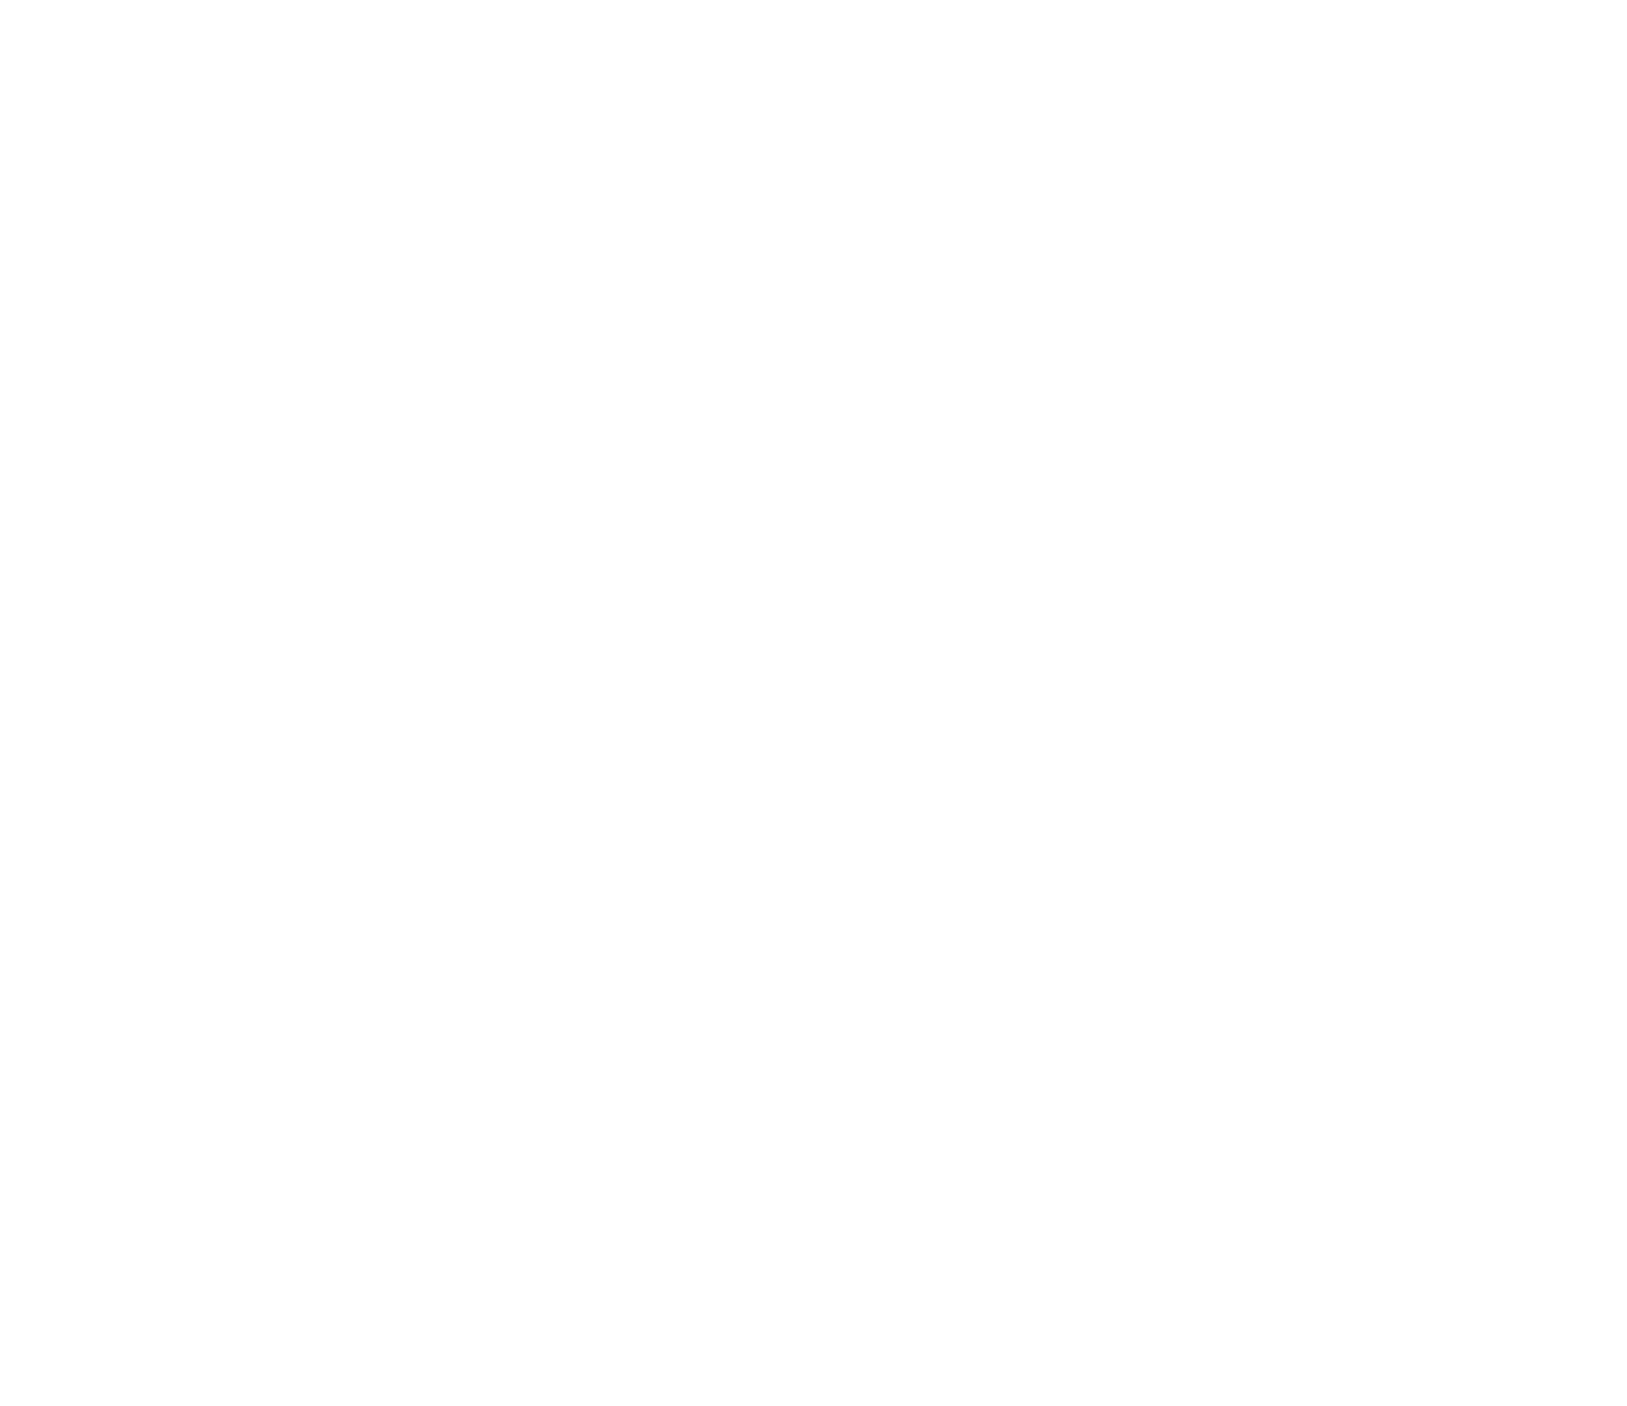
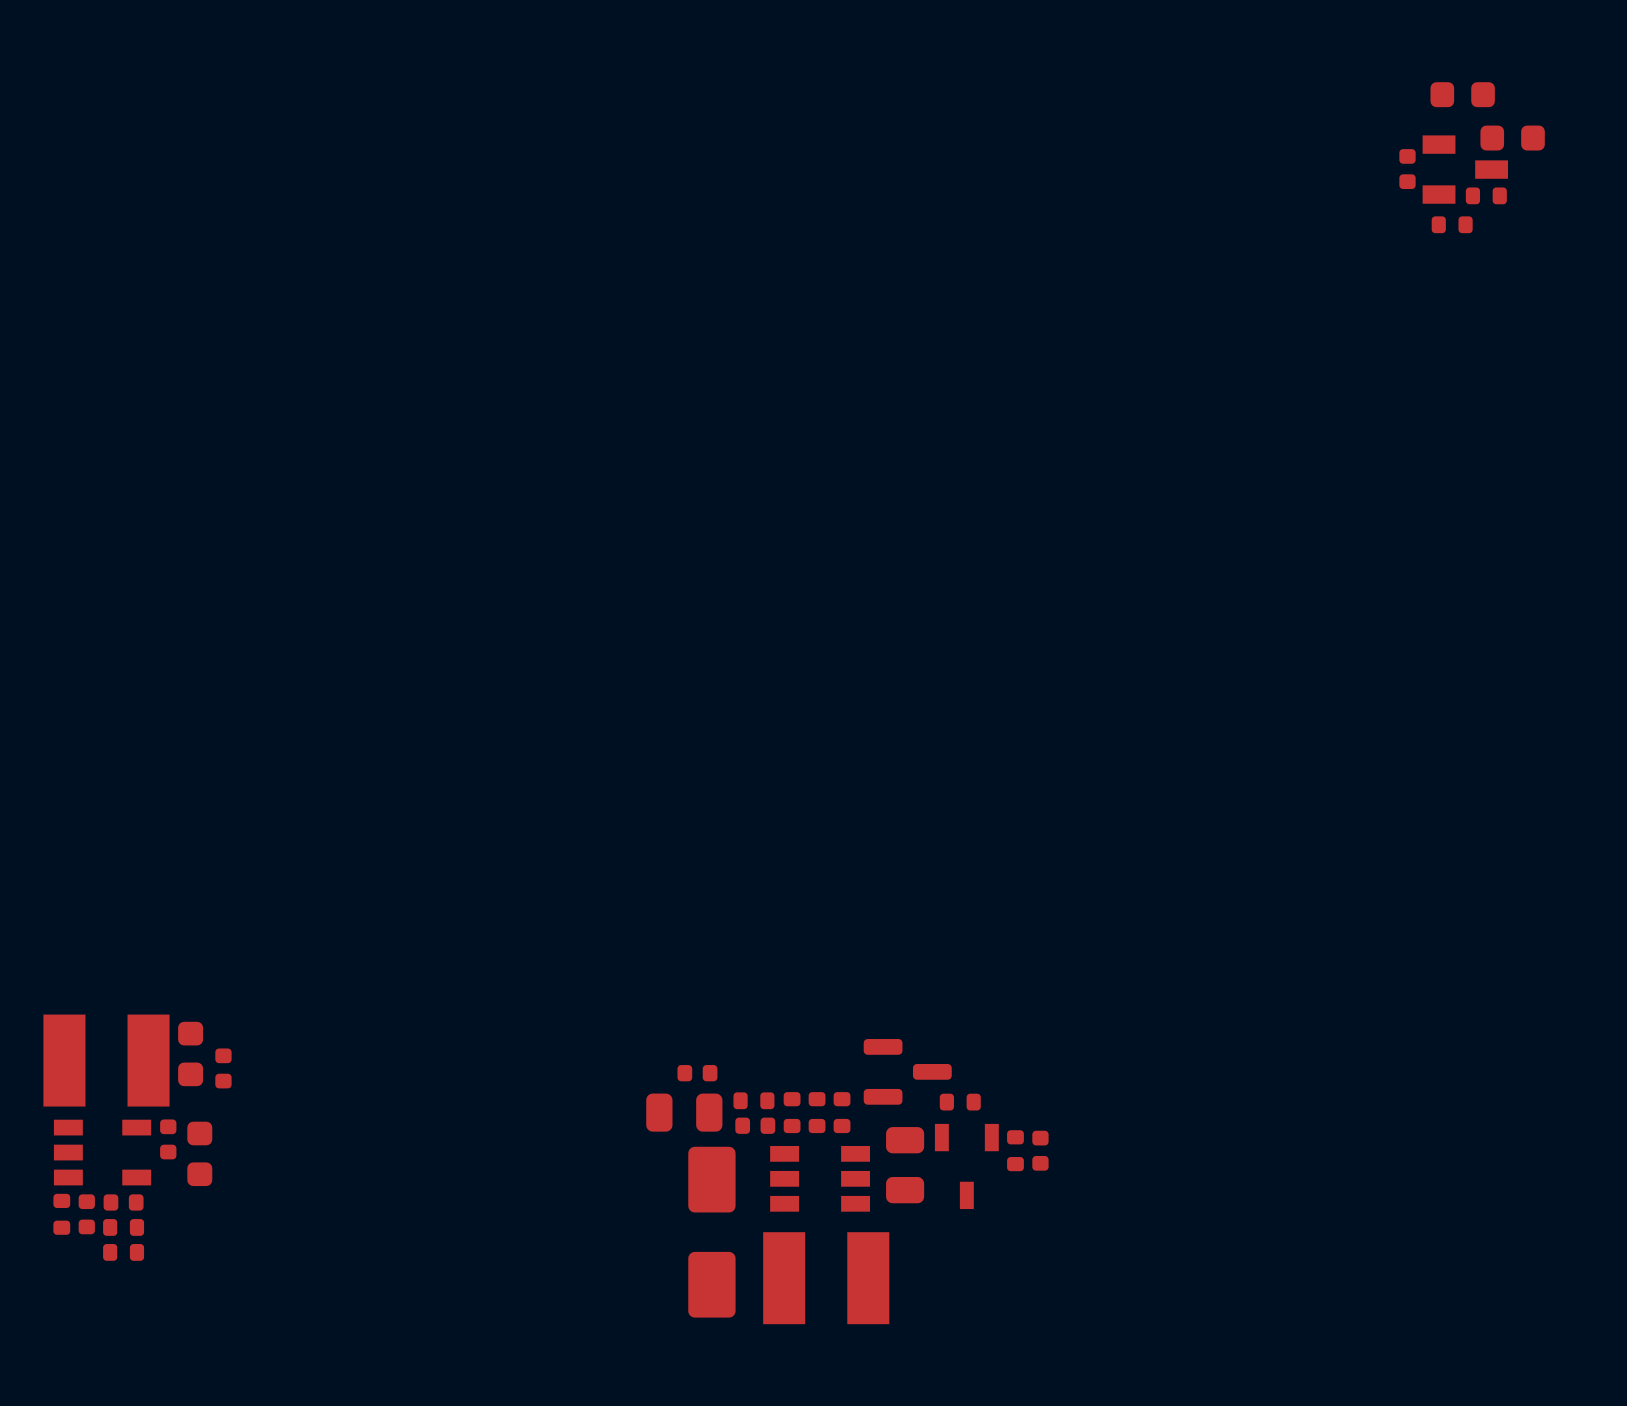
part: none -> (1462, 94)
part: none -> (1512, 138)
part: none -> (1407, 169)
part: none -> (1465, 169)
part: none -> (1486, 195)
part: none -> (1452, 224)
part: none -> (190, 1053)
part: none -> (106, 1060)
part: none -> (223, 1068)
part: none -> (907, 1071)
part: none -> (697, 1073)
part: none -> (753, 1100)
part: none -> (960, 1102)
part: none -> (684, 1112)
part: none -> (792, 1112)
part: none -> (817, 1112)
part: none -> (842, 1112)
part: none -> (755, 1125)
part: none -> (168, 1139)
part: none -> (1015, 1150)
part: none -> (1040, 1150)
part: none -> (102, 1152)
part: none -> (199, 1153)
part: none -> (905, 1165)
part: none -> (966, 1166)
part: none -> (820, 1178)
part: none -> (123, 1202)
part: none -> (61, 1214)
part: none -> (86, 1214)
part: none -> (123, 1227)
part: none -> (711, 1232)
part: none -> (123, 1252)
part: none -> (826, 1278)

